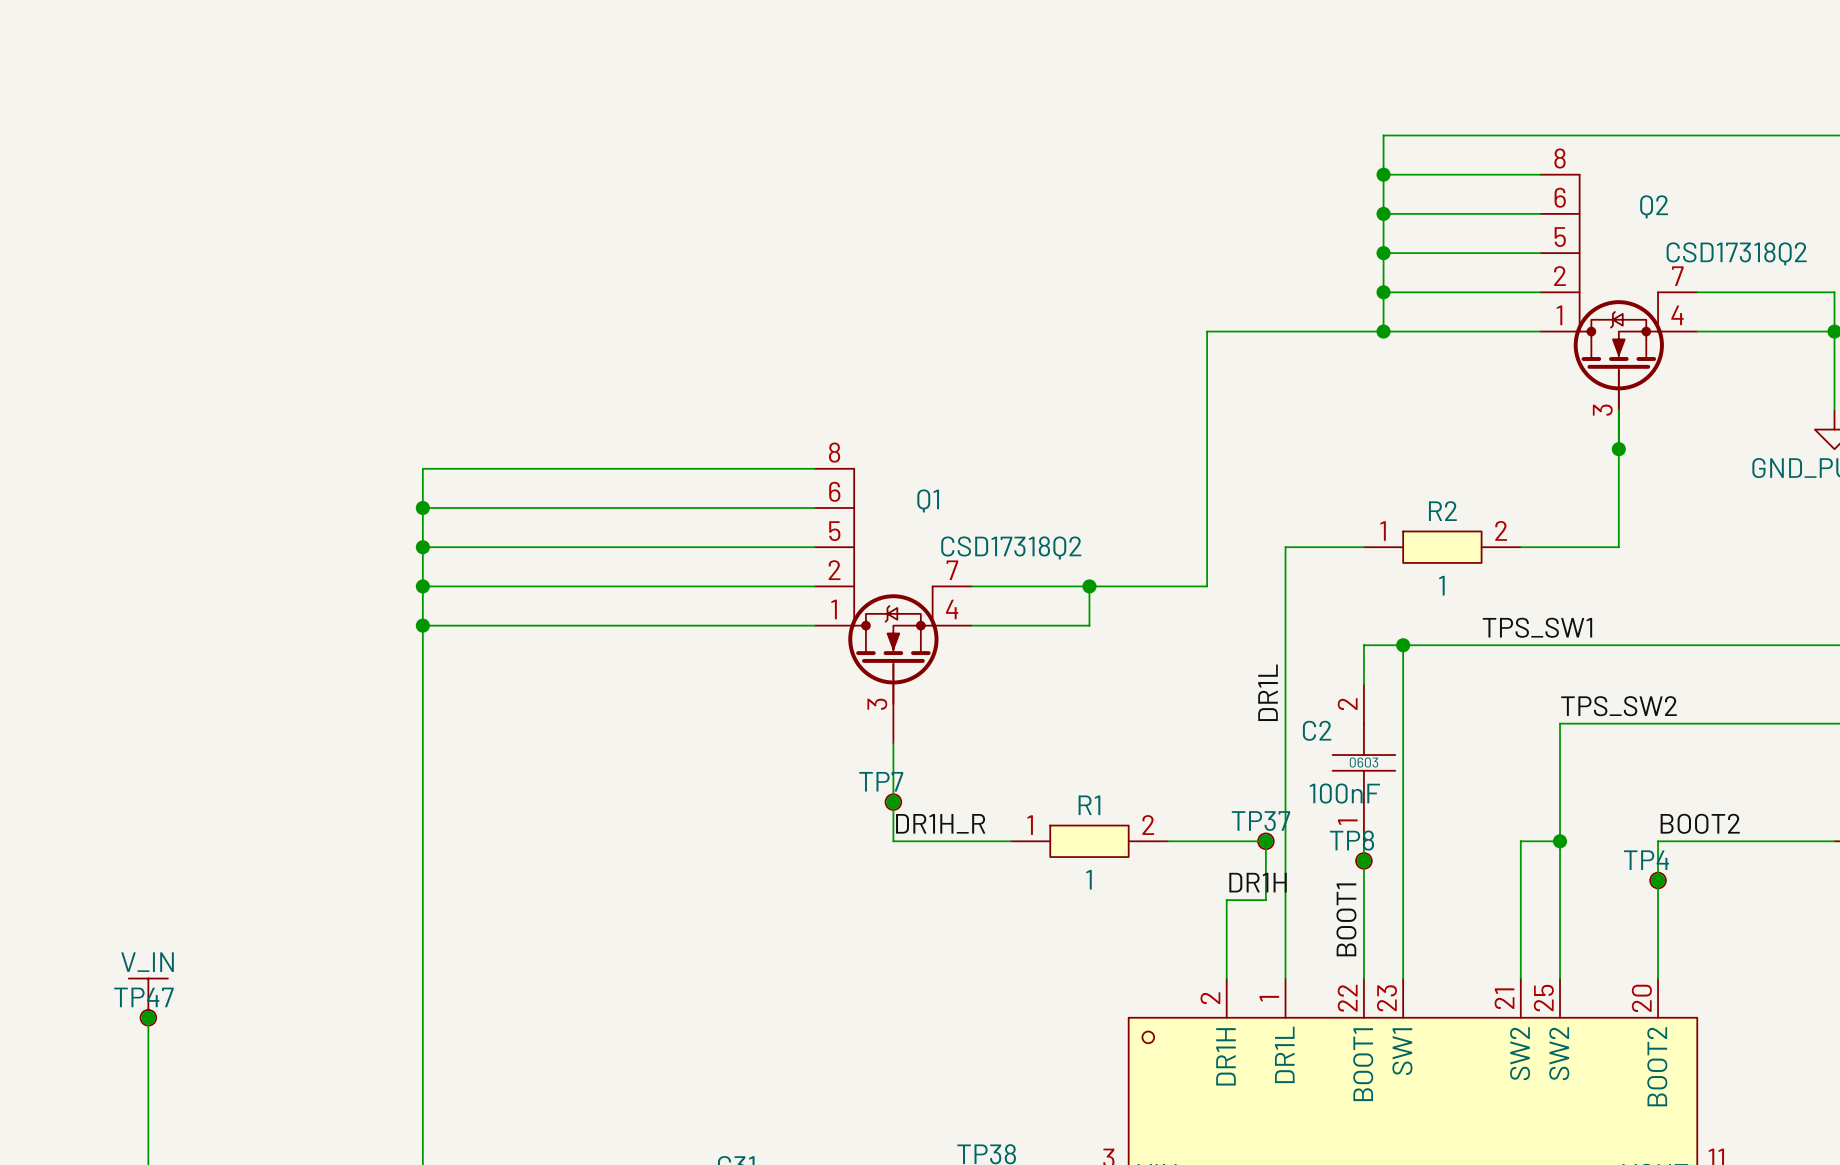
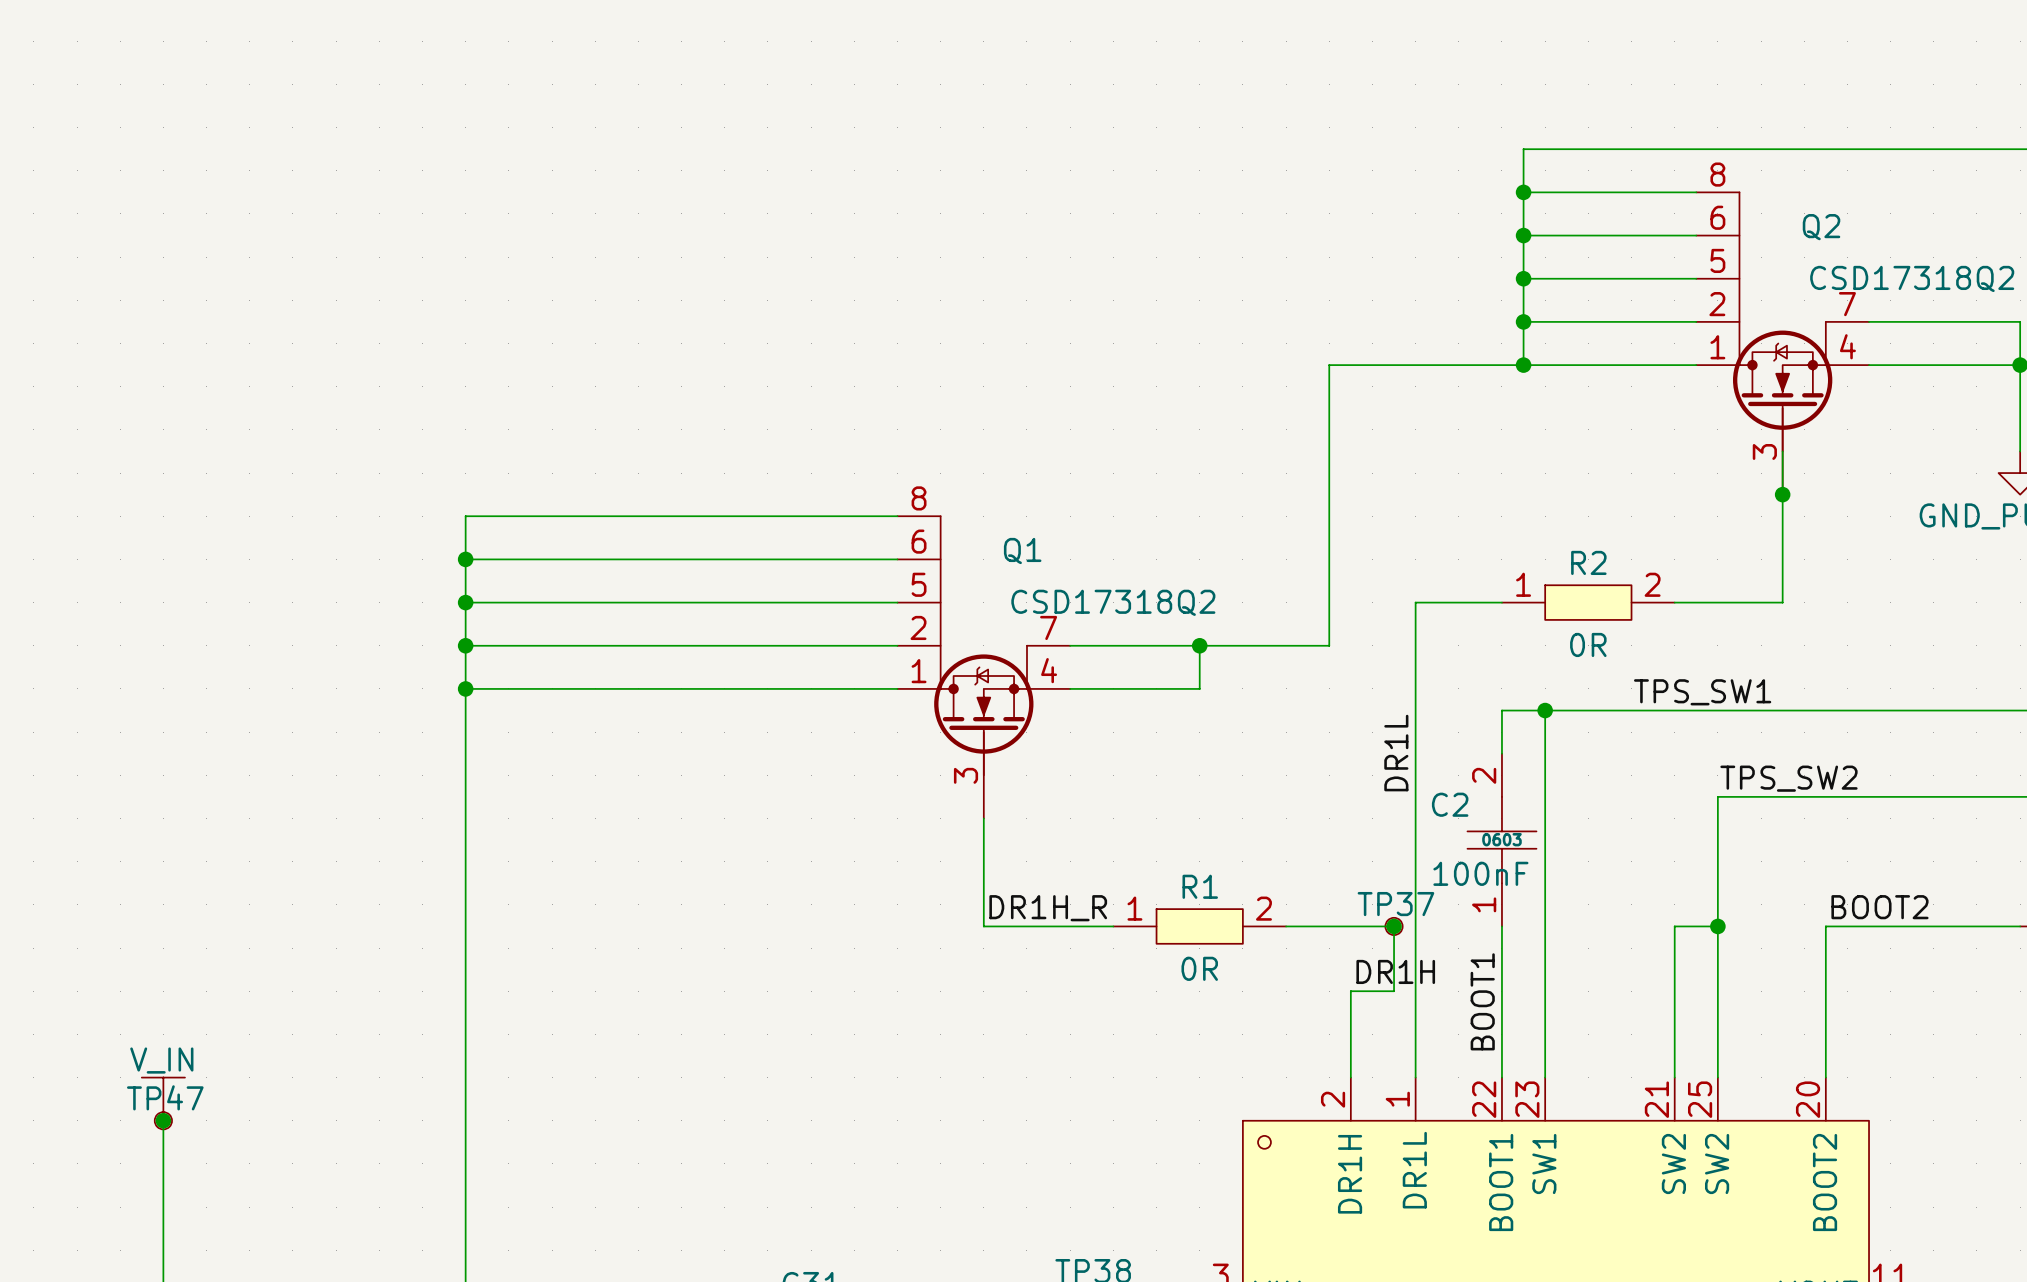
R2 text: 1 (1441, 585) -> 0R (1588, 644)
junction: (893, 802) -> none
TP7: (893, 802) -> none
junction: (1363, 860) -> none
TP8: (1363, 860) -> none
R1 text: 1 (1088, 879) -> 0R (1199, 968)
junction: (1658, 880) -> none
TP4: (1658, 880) -> none

